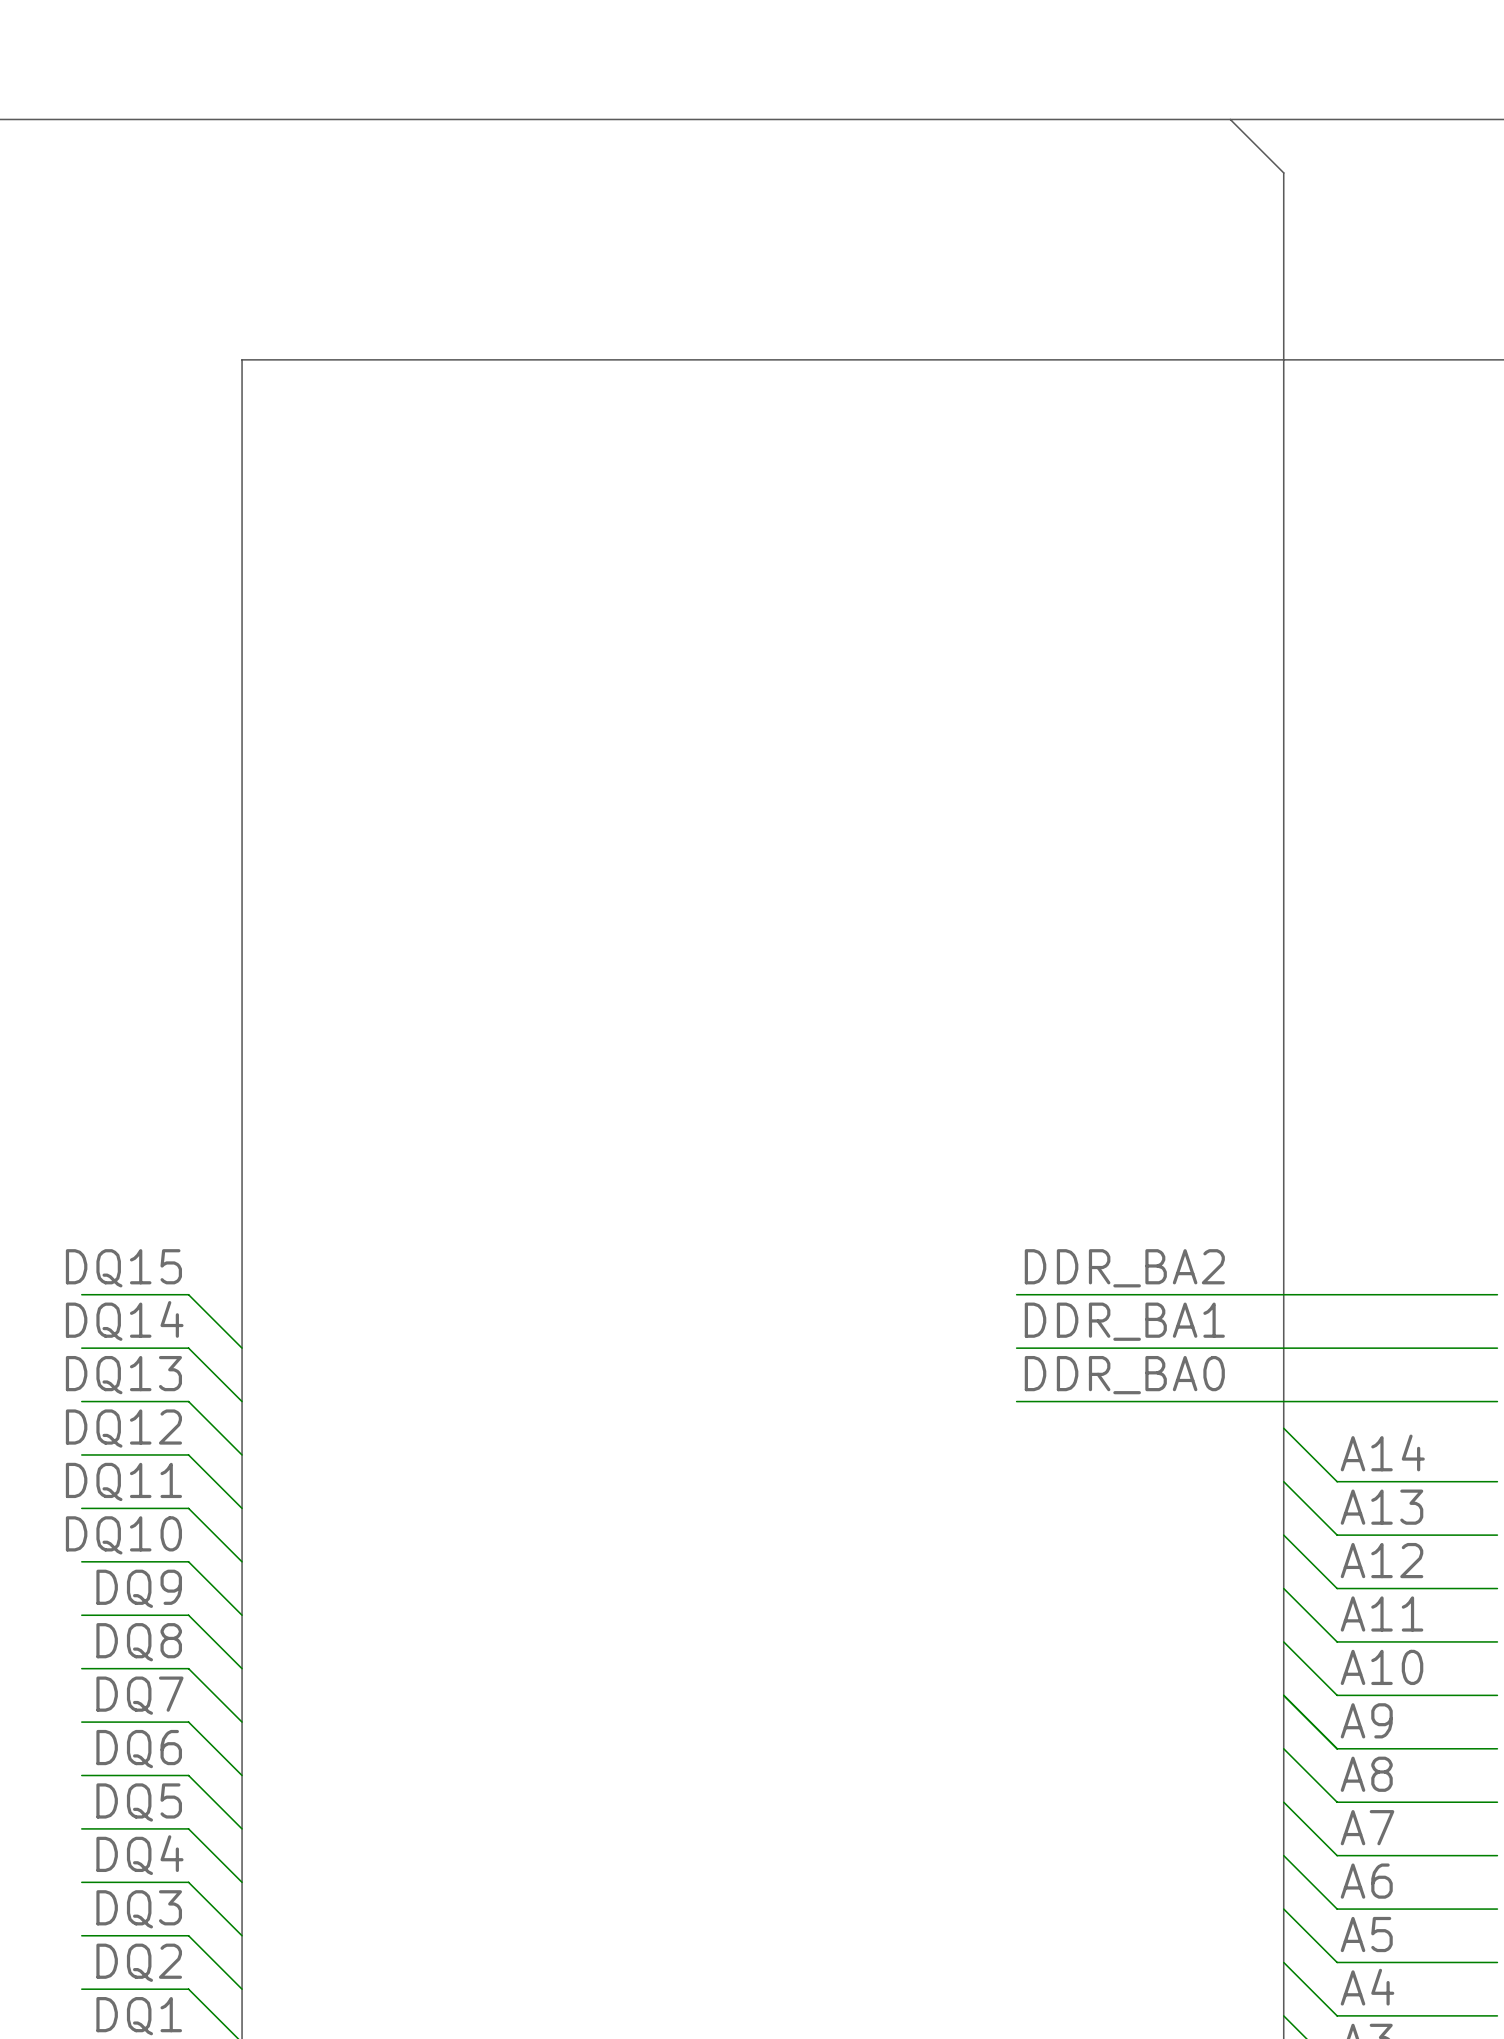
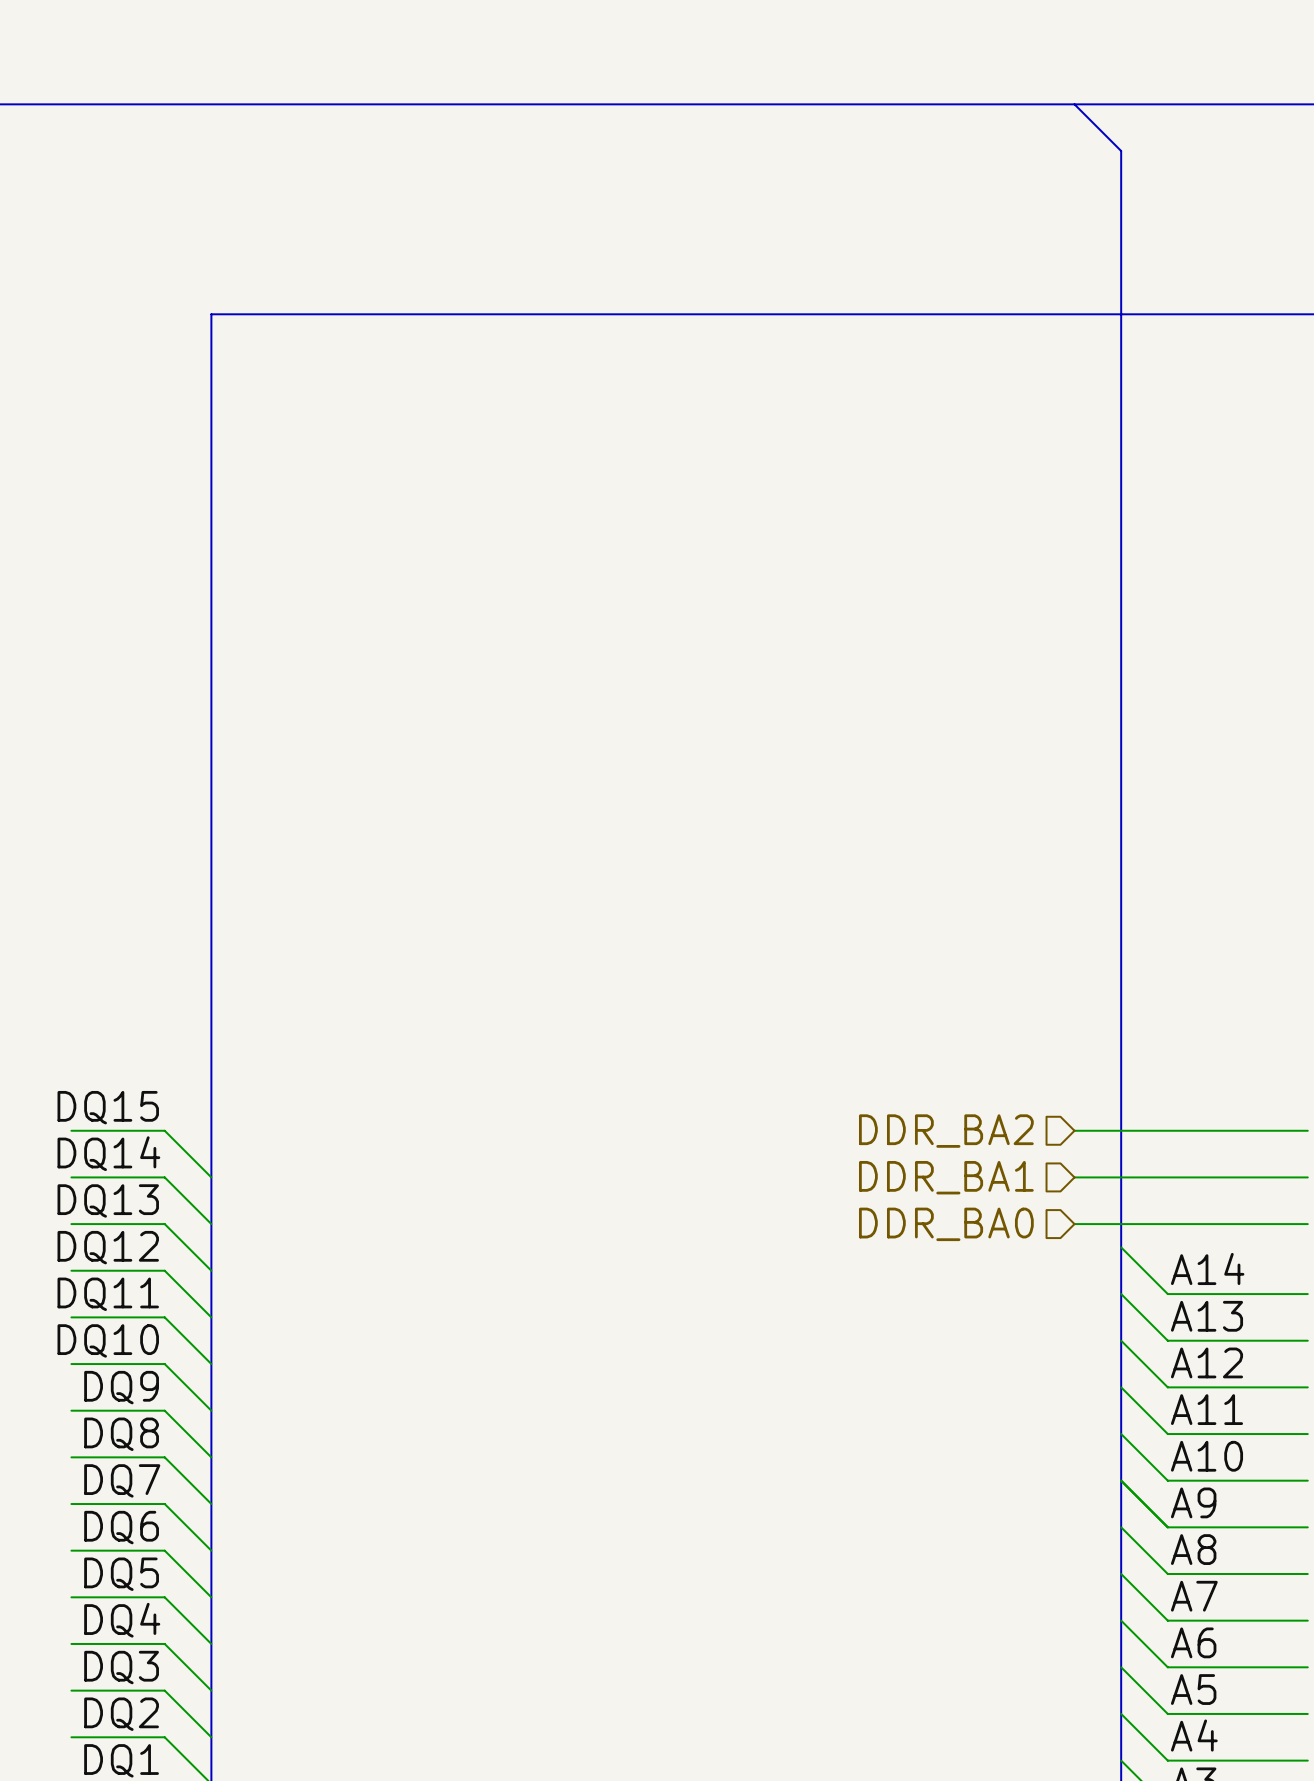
label: DDR_BA2 (1124, 1268) -> none
wire: (1016, 1294) (1230, 1294) -> none
hierarchical label: none -> DDR_BA2 (946, 1131)
label: DDR_BA1 (1124, 1321) -> none
wire: (1016, 1348) (1230, 1348) -> none
hierarchical label: none -> DDR_BA1 (946, 1177)
label: DDR_BA0 (1124, 1375) -> none
wire: (1016, 1401) (1230, 1401) -> none
hierarchical label: none -> DDR_BA0 (946, 1224)

